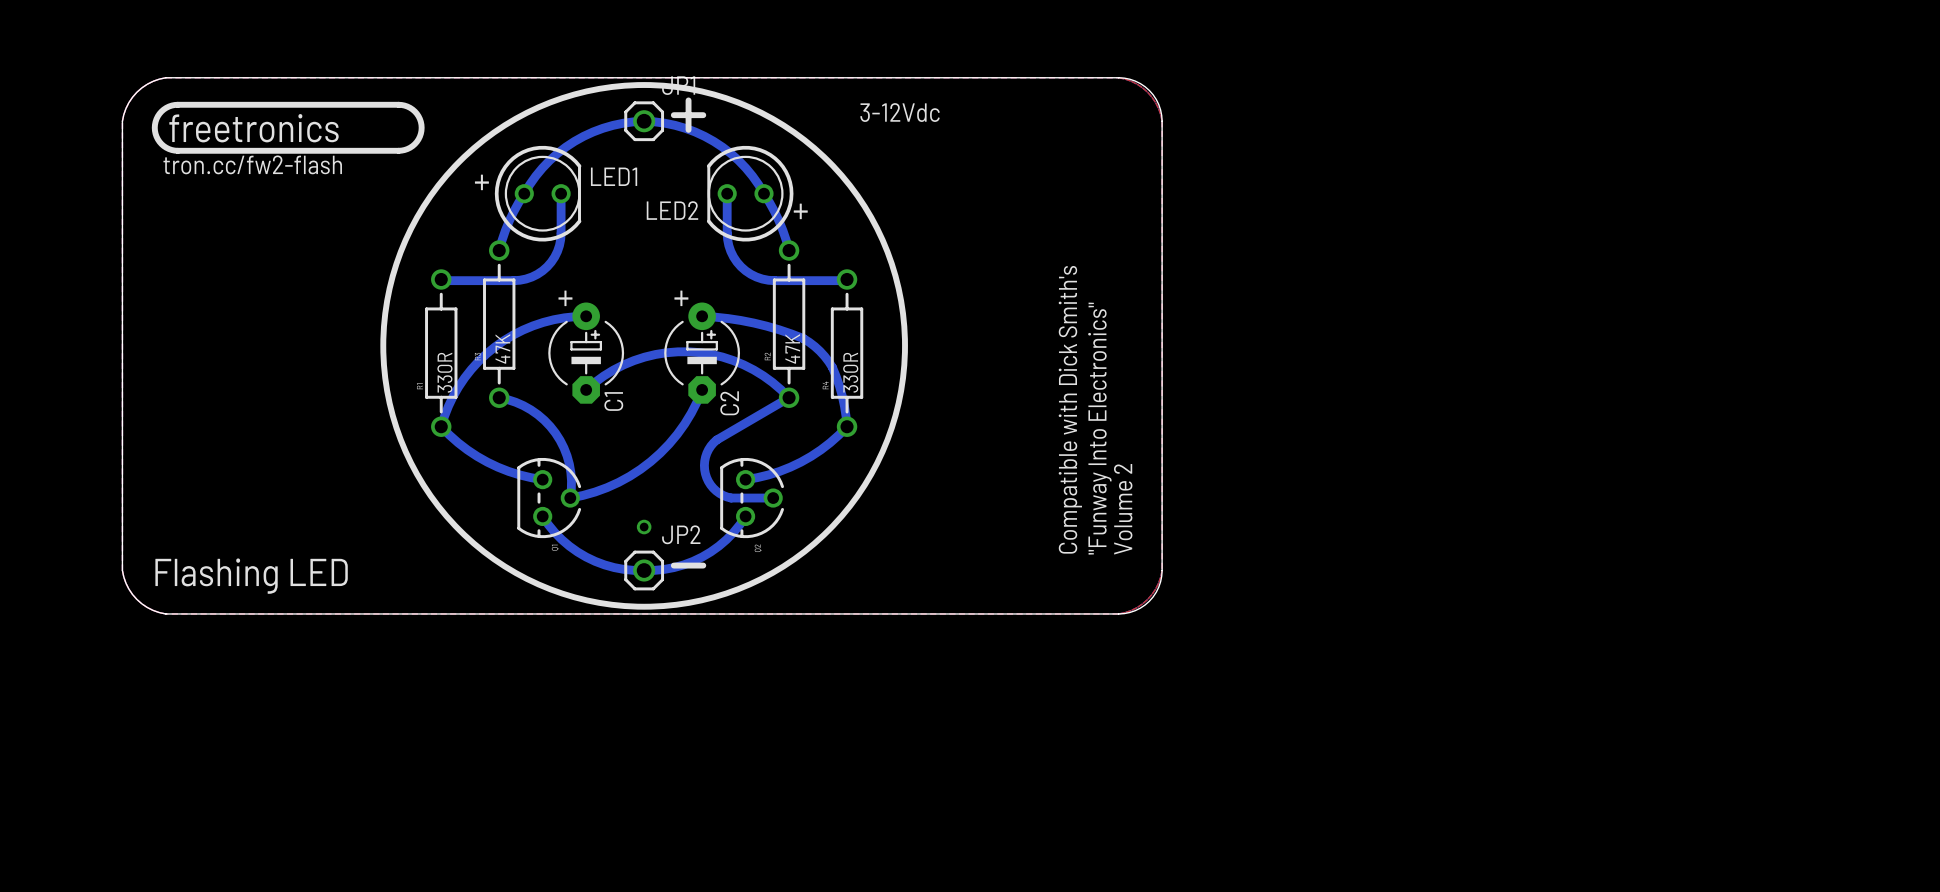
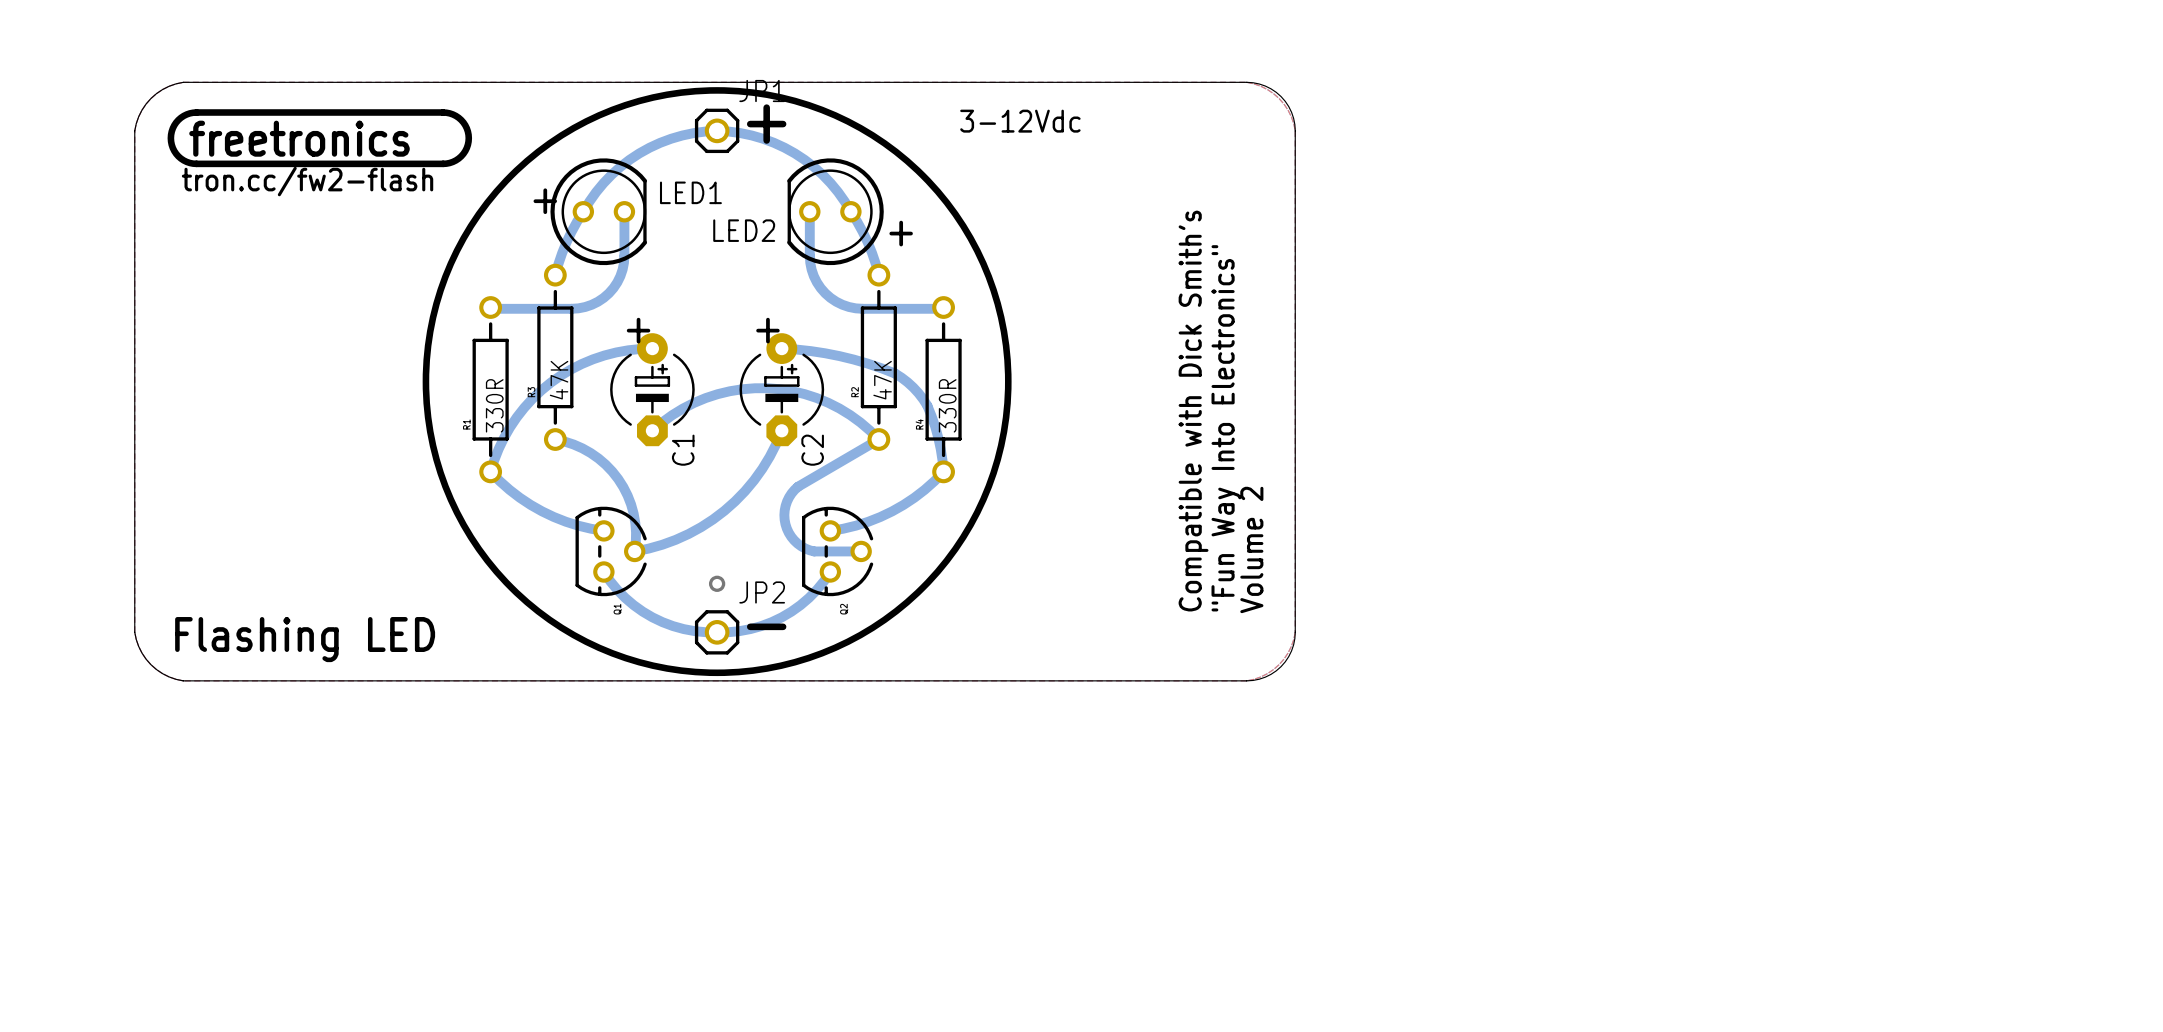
text: "Funway Into Electronics" (1099, 428) -> "Fun Way Into Electronics" (1226, 428)

